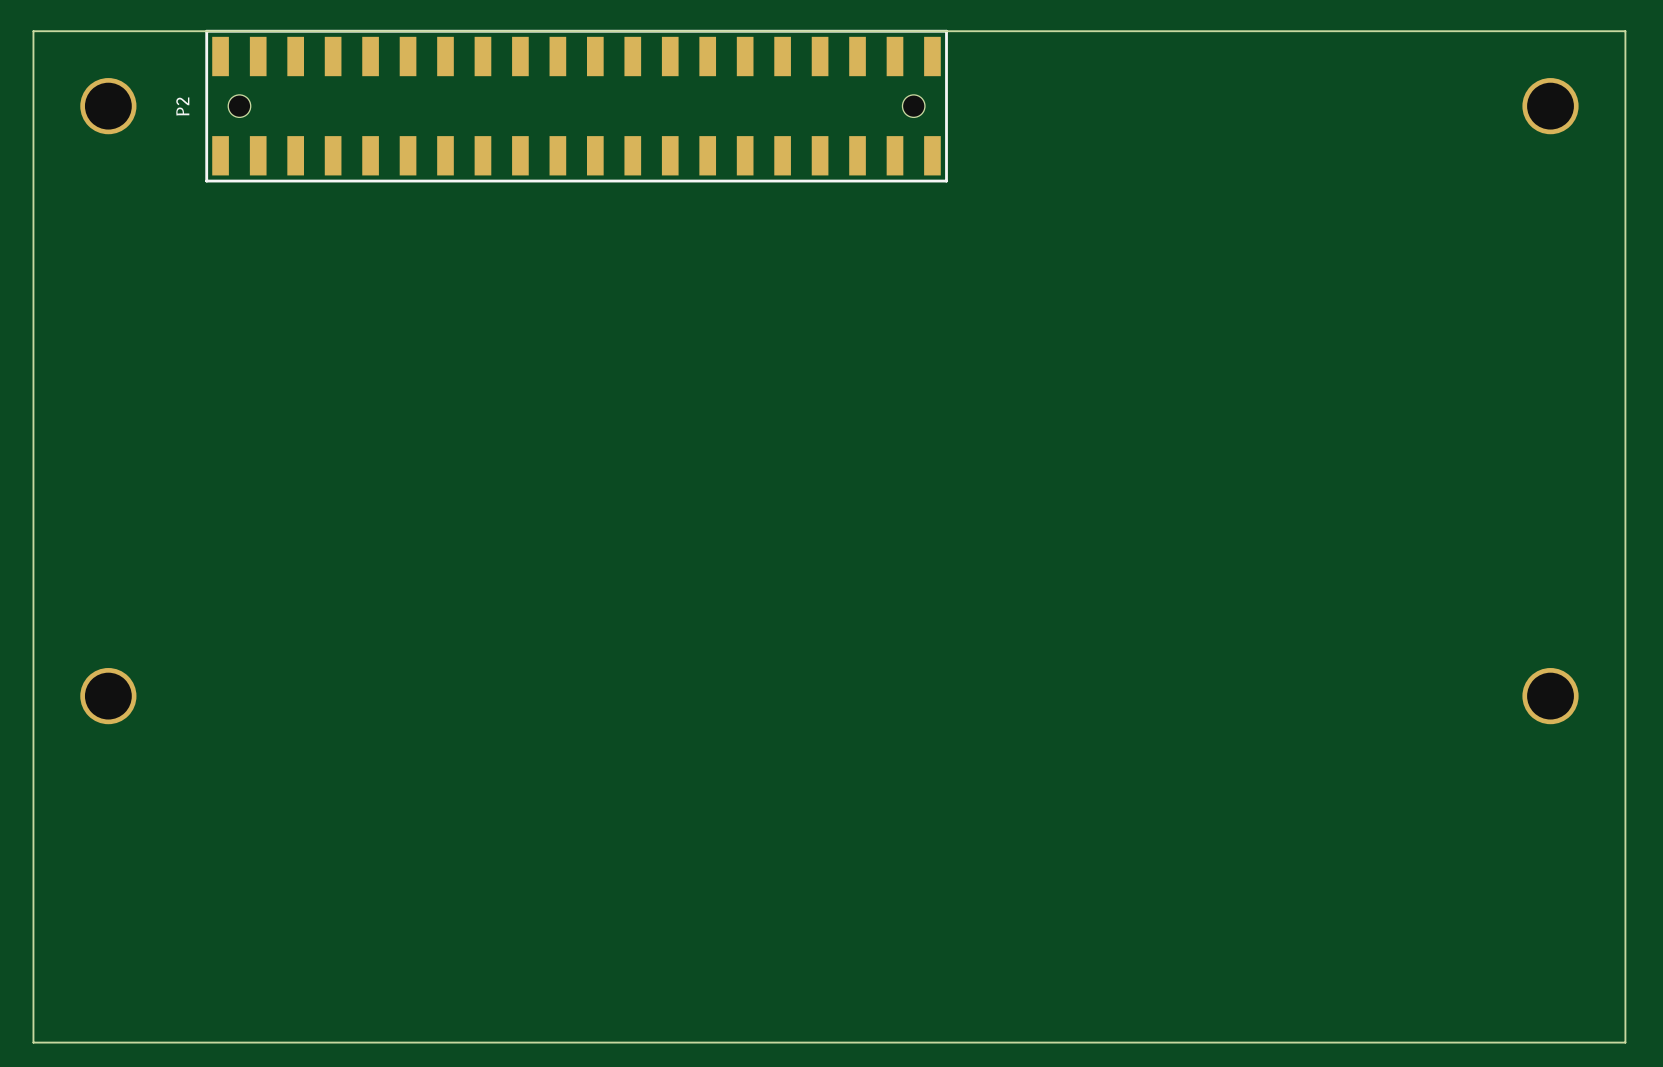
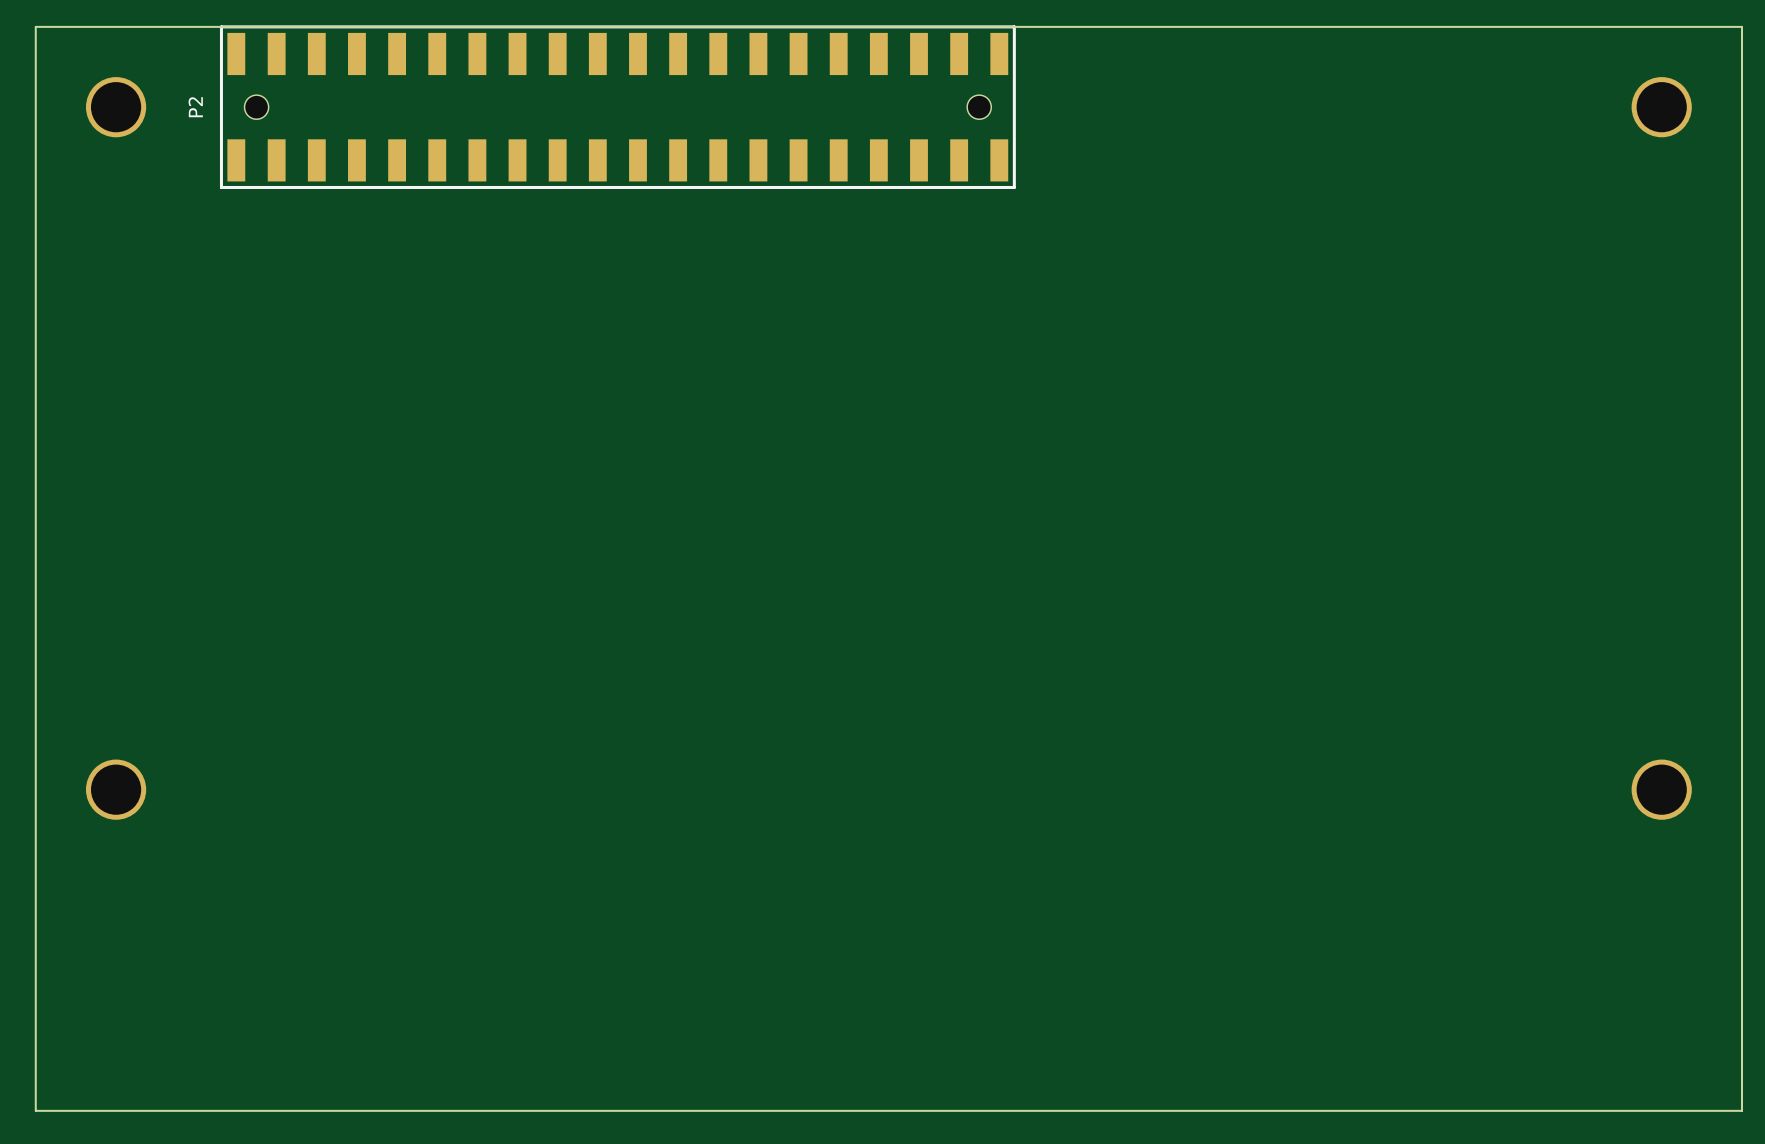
part position: (108, 696) -> (116, 789)
part position: (1550, 696) -> (1661, 789)

